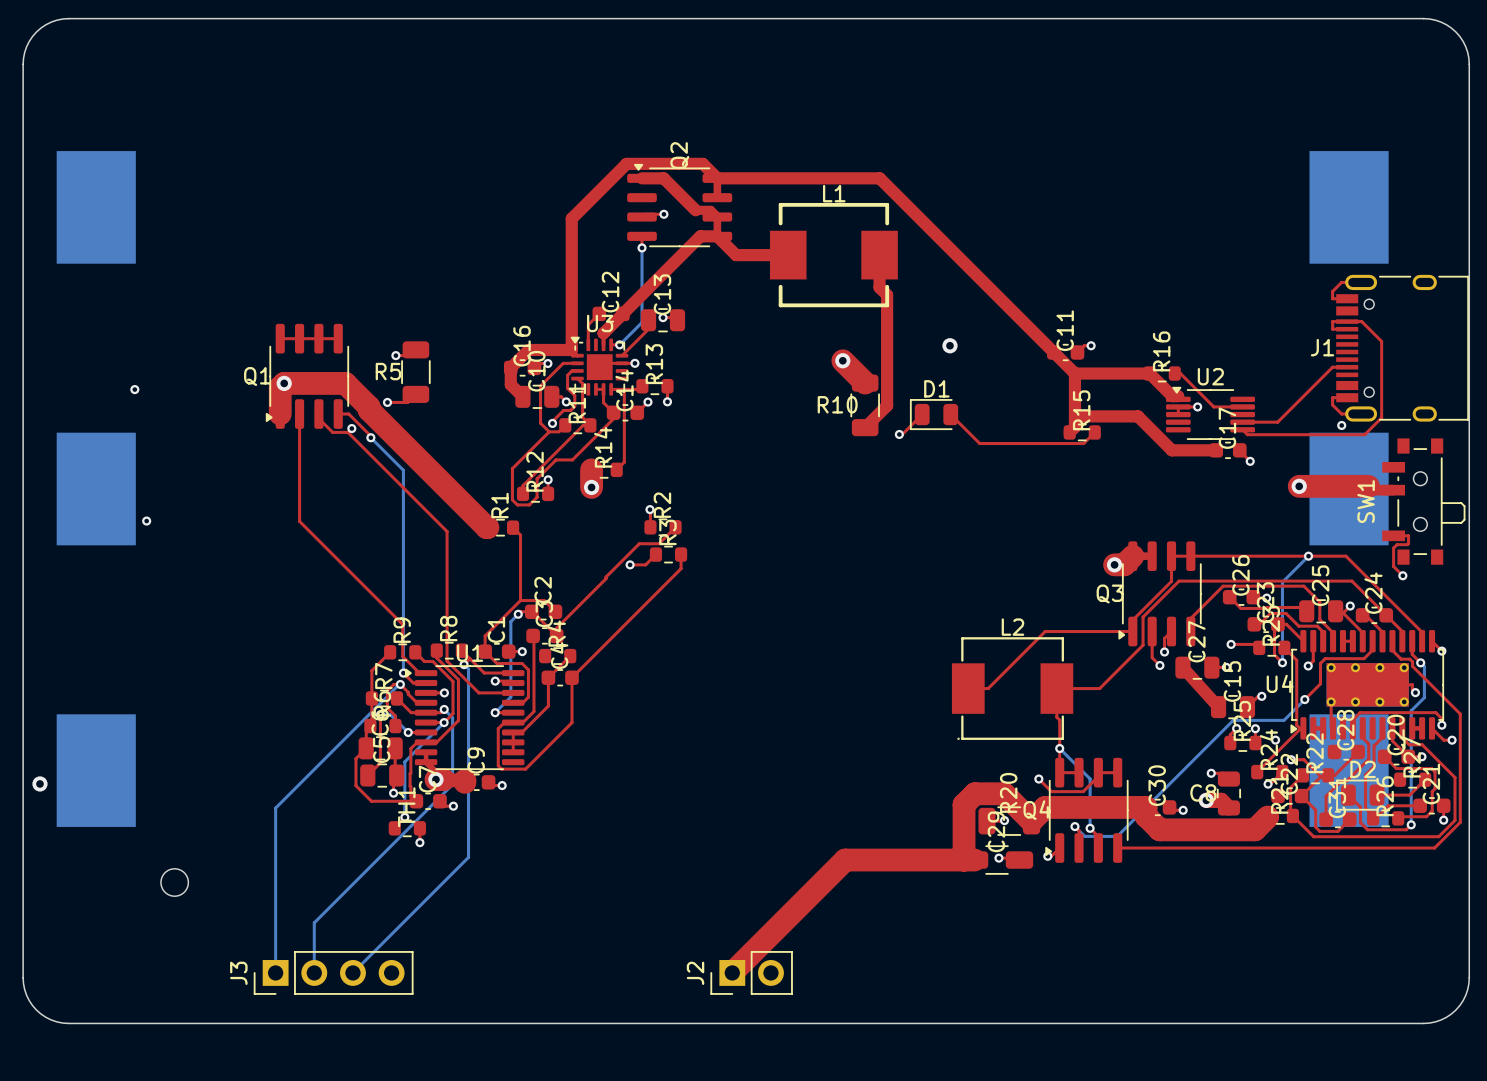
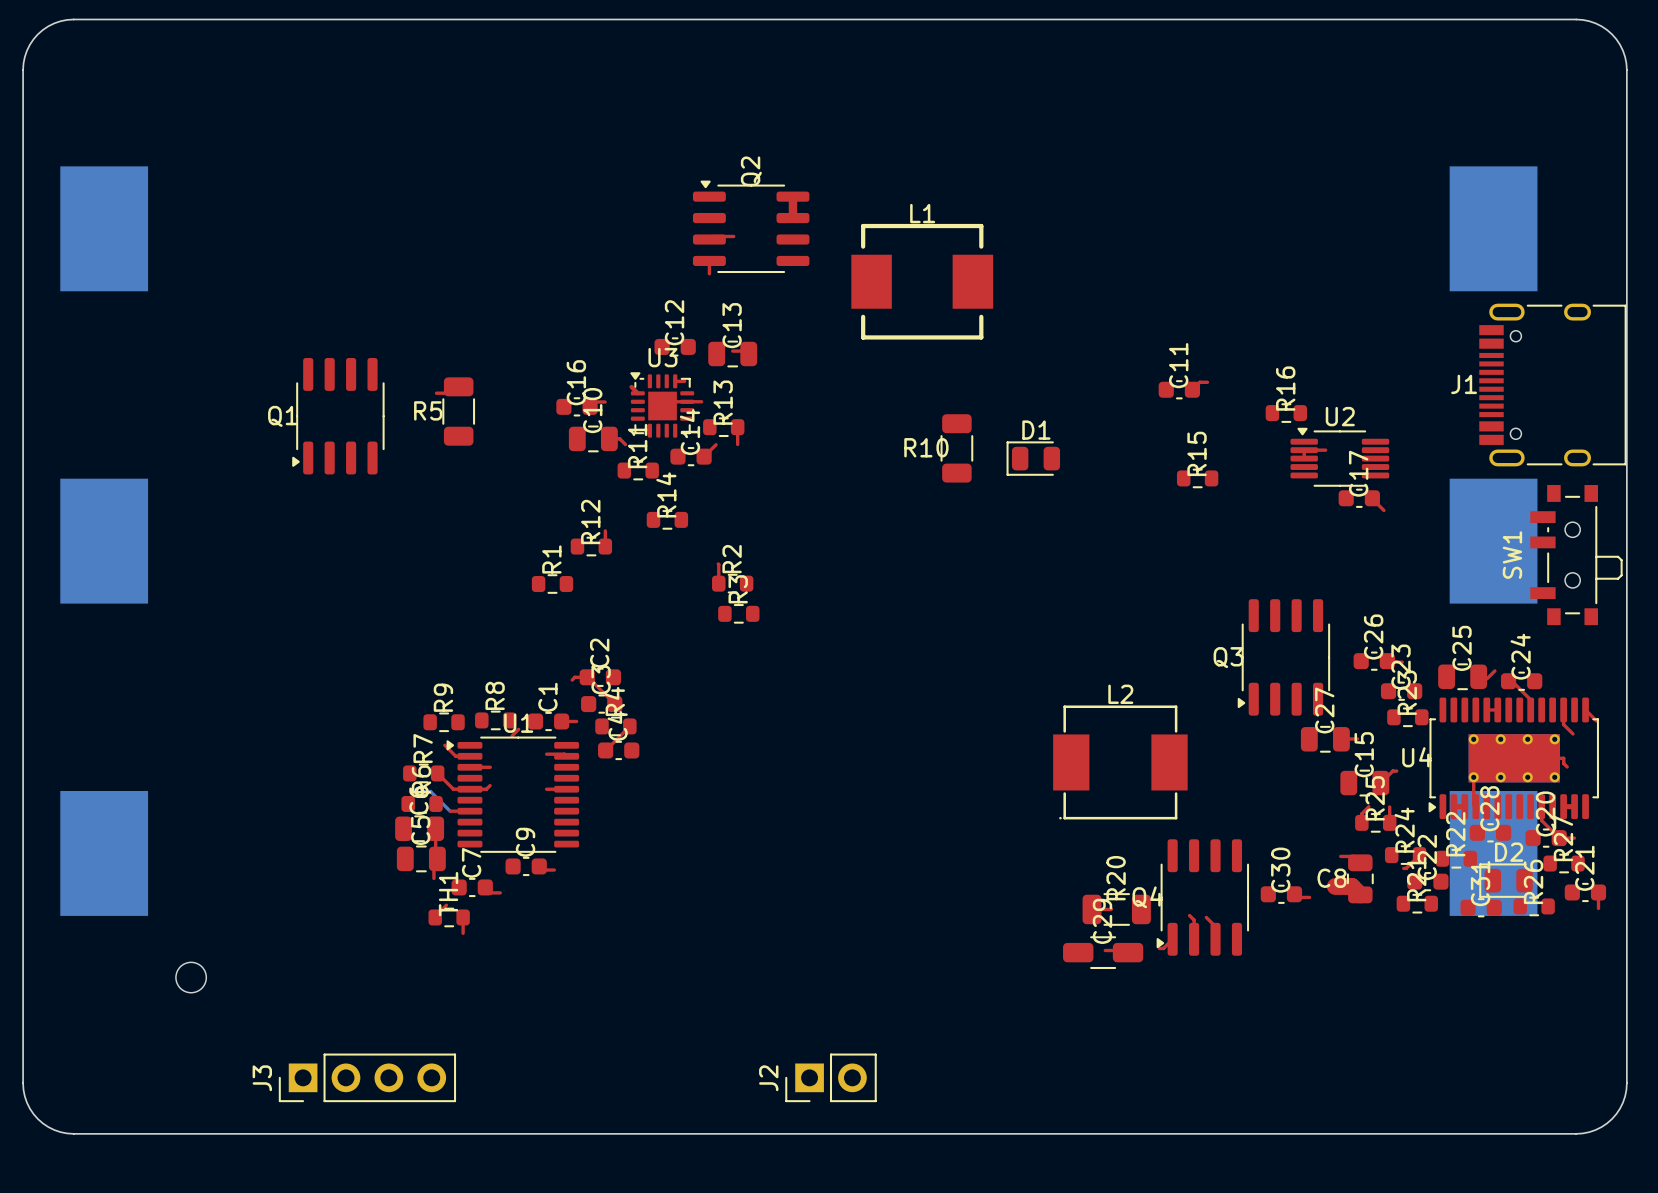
top track: (642, 178) (663, 178) (695, 210) (710, 210) (717, 217) (717, 236) -> none
via: (663, 214) -> none
top track: (717, 236) (700, 236) (603, 333) (603, 344) -> none
top track: (717, 236) (736, 255) (788, 255) -> none
bottom track: (642, 247) (642, 322) (619, 344) -> none
via: (642, 247) -> none
top track: (879, 255) (879, 287) (887, 295) (887, 405) (865, 427) -> none
top track: (1361, 282) (1341, 282) (1332, 291) (1332, 298) (1347, 298) -> none
top track: (599, 313) (588, 324) (588, 344) -> none
via: (663, 317) -> none
top track: (648, 320) (648, 329) (622, 355) -> none
top track: (1347, 329) (1332, 329) (1332, 321) (1361, 321) (1381, 341) (1381, 417) (1364, 434) (1247, 434) (1242, 429) -> none
top track: (280, 338) (338, 338) -> none
via: (619, 344) -> none
via: (949, 345) -> none
via: (1091, 345) -> none
via: (395, 355) -> none
top track: (842, 360) (865, 383) -> none
via: (842, 360) -> none
via: (547, 363) -> none
top track: (577, 363) (563, 363) (540, 386) (540, 423) (549, 431) -> none
via: (634, 363) -> none
top track: (1347, 367) (1332, 367) (1277, 422) (1242, 422) -> none
top track: (577, 370) (572, 370) (567, 375) (567, 388) (574, 395) (574, 406) (570, 410) (563, 410) (552, 423) -> none
top track: (1074, 373) (1149, 373) (1172, 396) (1178, 396) (1178, 399) -> none
top track: (1074, 373) (1074, 427) (1069, 432) -> none
top track: (1074, 373) (879, 178) (717, 178) (702, 163) (626, 163) (571, 218) (571, 349) (528, 349) (510, 367) (510, 384) (522, 396) -> none
top track: (1174, 373) (1180, 373) (1213, 406) (1242, 406) -> none
top track: (577, 378) (582, 383) (582, 417) (590, 425) (583, 425) (523, 485) (523, 493) -> none
via: (284, 383) -> none
top track: (642, 386) (639, 389) (611, 389) -> none
via: (134, 389) -> none
top track: (595, 389) (603, 389) (603, 402) (613, 412) (613, 418) (572, 459) (556, 459) (537, 478) (537, 497) (529, 504) (517, 504) (512, 499) (512, 468) (549, 431) -> none
top track: (624, 389) (624, 462) (616, 469) -> none
top track: (415, 394) (407, 402) (387, 402) -> none
top track: (1347, 397) (1332, 397) (1332, 405) (1341, 413) (1361, 413) -> none
via: (566, 401) -> none
via: (667, 401) -> none
via: (387, 402) -> none
via: (647, 402) -> none
via: (1197, 406) -> none
top track: (280, 414) (280, 387) (284, 383) (345, 383) (369, 407) (369, 410) (487, 527) -> none
top track: (299, 414) (299, 521) (402, 624) (402, 656) (419, 673) (426, 673) -> none
top track: (318, 414) (318, 418) (332, 432) (347, 432) -> none
top track: (338, 414) (348, 414) (370, 437) -> none
top track: (922, 414) (902, 434) (899, 434) -> none
top track: (950, 414) (979, 443) (1083, 443) (1094, 432) -> none
top track: (1074, 416) (1137, 416) (1171, 450) (1216, 450) -> none
via: (552, 423) -> none
top track: (565, 425) (558, 431) (549, 431) -> none
via: (1341, 425) -> none
via: (351, 428) -> none
top track: (347, 432) (447, 531) (447, 661) (478, 692) (513, 692) -> none
via: (899, 434) -> none
bottom track: (370, 437) (403, 470) (403, 673) -> none
via: (370, 437) -> none
via: (1250, 461) -> none
top track: (591, 469) (591, 487) -> none
via: (548, 479) -> none
top track: (1299, 486) (1370, 486) (1374, 490) (1393, 490) -> none
via: (1299, 486) -> none
via: (591, 487) -> none
via: (649, 509) -> none
via: (146, 521) -> none
top track: (513, 527) (520, 535) (520, 600) -> none
top track: (675, 527) (659, 543) (639, 543) (552, 632) -> none
top track: (1393, 535) (1408, 535) (1407, 544) (1397, 544) (1393, 548) (1393, 566) (1402, 575) -> none
top track: (655, 554) (645, 564) (630, 564) -> none
top track: (681, 554) (681, 568) (571, 677) (571, 722) (525, 769) (501, 769) (498, 765) (498, 728) (504, 722) (522, 722) (533, 711) (533, 635) -> none
top track: (1152, 556) (1132, 556) (1124, 564) (1114, 564) -> none
bottom track: (1308, 556) (1282, 582) (1282, 662) -> none
via: (1308, 556) -> none
via: (630, 564) -> none
via: (1114, 564) -> none
via: (1402, 575) -> none
top track: (1229, 597) (1240, 608) (1302, 607) (1306, 611) -> none
via: (1266, 598) -> none
top track: (520, 600) (485, 635) (485, 651) (497, 663) (522, 663) (528, 669) (528, 697) (522, 702) (513, 702) -> none
top track: (520, 600) (544, 600) (555, 611) -> none
via: (1350, 606) -> none
top track: (1335, 611) (1341, 611) (1362, 632) (1362, 641) -> none
bottom track: (518, 614) (510, 621) (510, 697) (495, 712) -> none
via: (518, 614) -> none
top track: (1254, 624) (1259, 624) (1270, 613) (1286, 613) (1298, 626) (1317, 626) (1323, 632) (1323, 641) -> none
top track: (1152, 631) (1152, 657) (1159, 665) -> none
top track: (1171, 631) (1164, 638) (1164, 652) -> none
top track: (1190, 631) (1190, 618) (1223, 586) (1303, 586) (1319, 602) (1319, 619) (1333, 632) (1333, 641) -> none
top track: (1303, 641) (1286, 624) (1277, 624) (1274, 627) (1274, 654) (1282, 662) -> none
top track: (1313, 641) (1313, 660) (1308, 665) -> none
top track: (1372, 641) (1372, 650) (1364, 658) (1325, 658) (1320, 663) (1320, 683) (1304, 699) -> none
top track: (1392, 641) (1392, 650) (1401, 659) (1409, 659) (1412, 661) (1412, 666) (1460, 714) (1460, 822) (1434, 848) (1117, 848) -> none
top track: (1402, 641) (1402, 631) (1351, 581) (1178, 581) (1143, 617) (1143, 645) (1099, 688) (1056, 688) (1056, 717) (1059, 720) (1059, 772) (1079, 772) -> none
top track: (1422, 641) (1422, 632) (1345, 556) (1171, 556) (1171, 581) (1132, 620) (1132, 631) (1045, 631) (988, 688) (968, 688) -> none
top track: (1231, 644) (1255, 644) (1259, 647) -> none
via: (1231, 644) -> none
top track: (1284, 647) (1296, 660) (1296, 725) (1299, 728) -> none
top track: (436, 650) (436, 657) (458, 679) (458, 720) (436, 742) (417, 742) (410, 748) (410, 795) (416, 801) (371, 801) (355, 785) (355, 758) (366, 748) (366, 730) (371, 724) (371, 670) (390, 652) -> none
top track: (461, 650) (484, 673) (513, 673) -> none
via: (522, 651) -> none
via: (1441, 651) -> none
top track: (415, 652) (424, 661) (433, 661) (453, 681) (453, 713) (444, 722) (426, 722) -> none
via: (1164, 652) -> none
via: (1282, 662) -> none
bottom track: (1420, 662) (1424, 666) (1424, 697) (1411, 710) (1411, 824) -> none
via: (1420, 662) -> none
bottom track: (464, 664) (468, 669) (468, 857) (352, 972) -> none
via: (464, 664) -> none
via: (1159, 665) -> none
via: (1308, 665) -> none
top track: (1182, 667) (1218, 707) -> none
via: (1226, 667) -> none
via: (403, 673) -> none
top track: (548, 677) (548, 706) (521, 732) (513, 732) (513, 752) -> none
via: (495, 681) -> none
bottom track: (400, 684) (275, 808) (275, 972) -> none
via: (400, 684) -> none
via: (444, 692) -> none
via: (1415, 692) -> none
via: (1261, 696) -> none
bottom track: (1304, 699) (1283, 720) (1233, 720) (1117, 836) (1084, 836) (1074, 826) -> none
via: (1304, 699) -> none
top track: (426, 702) (416, 702) (400, 684) (393, 684) (387, 690) (387, 707) (395, 716) (395, 726) -> none
bottom track: (444, 709) (452, 717) (452, 784) (314, 922) (314, 972) -> none
via: (444, 709) -> none
via: (495, 712) -> none
top track: (380, 714) (380, 762) (367, 775) -> none
bottom track: (444, 722) (404, 761) (404, 817) -> none
via: (444, 722) -> none
top track: (1441, 725) (1441, 718) (1435, 712) (1360, 712) (1352, 719) (1352, 728) -> none
via: (1441, 725) -> none
via: (1236, 728) -> none
via: (1255, 728) -> none
top track: (1299, 728) (1257, 772) -> none
top track: (1362, 728) (1362, 737) (1368, 743) (1368, 759) (1347, 780) (1341, 780) (1326, 796) (1326, 819) -> none
top track: (1382, 728) (1382, 737) (1374, 745) (1374, 766) (1365, 775) (1365, 808) (1375, 818) -> none
top track: (1402, 728) (1402, 737) (1409, 744) (1422, 744) (1454, 777) (1454, 820) (1438, 836) (1313, 836) (1290, 813) (1290, 787) (1302, 775) -> none
top track: (1432, 728) (1443, 740) (1452, 740) -> none
via: (408, 732) -> none
via: (1275, 740) -> none
via: (1452, 740) -> none
bottom track: (1059, 748) (1090, 778) (1090, 828) -> none
via: (1059, 748) -> none
top track: (426, 752) (426, 762) (435, 772) (435, 779) (464, 780) (464, 782) -> none
top track: (1358, 752) (1334, 775) (1320, 776) -> none
top track: (1384, 756) (1396, 768) (1431, 768) (1435, 771) (1432, 810) (1426, 816) (1399, 816) (1398, 818) -> none
via: (1421, 756) -> none
top track: (1291, 759) (1303, 759) (1320, 776) -> none
via: (1291, 759) -> none
top track: (1117, 772) (1098, 772) (1098, 776) (1083, 791) (1051, 791) (1038, 779) -> none
via: (1211, 773) -> none
top track: (1320, 776) (1301, 796) (1315, 810) (1315, 827) (1319, 831) (1337, 831) (1349, 819) -> none
via: (435, 779) -> none
via: (1038, 779) -> none
top track: (1425, 779) (1409, 795) (1376, 795) -> none
via: (39, 783) -> none
via: (1268, 784) -> none
via: (502, 785) -> none
via: (393, 793) -> none
top track: (1348, 795) (1360, 807) (1360, 822) (1367, 829) (1406, 829) (1411, 824) -> none
via: (1206, 800) -> none
top track: (1420, 805) (1388, 805) (1375, 818) -> none
via: (453, 806) -> none
via: (1183, 810) -> none
top track: (1267, 815) (1254, 829) (1159, 829) (1145, 816) (1145, 807) (1045, 807) (1031, 821) (1004, 793) (974, 793) (964, 804) (964, 860) -> none
via: (404, 817) -> none
via: (1004, 820) -> none
via: (1443, 820) -> none
via: (1411, 824) -> none
via: (1074, 826) -> none
via: (1090, 828) -> none
via: (419, 842) -> none
via: (1047, 856) -> none
via: (998, 858) -> none
top track: (974, 860) (845, 860) (732, 972) -> none

